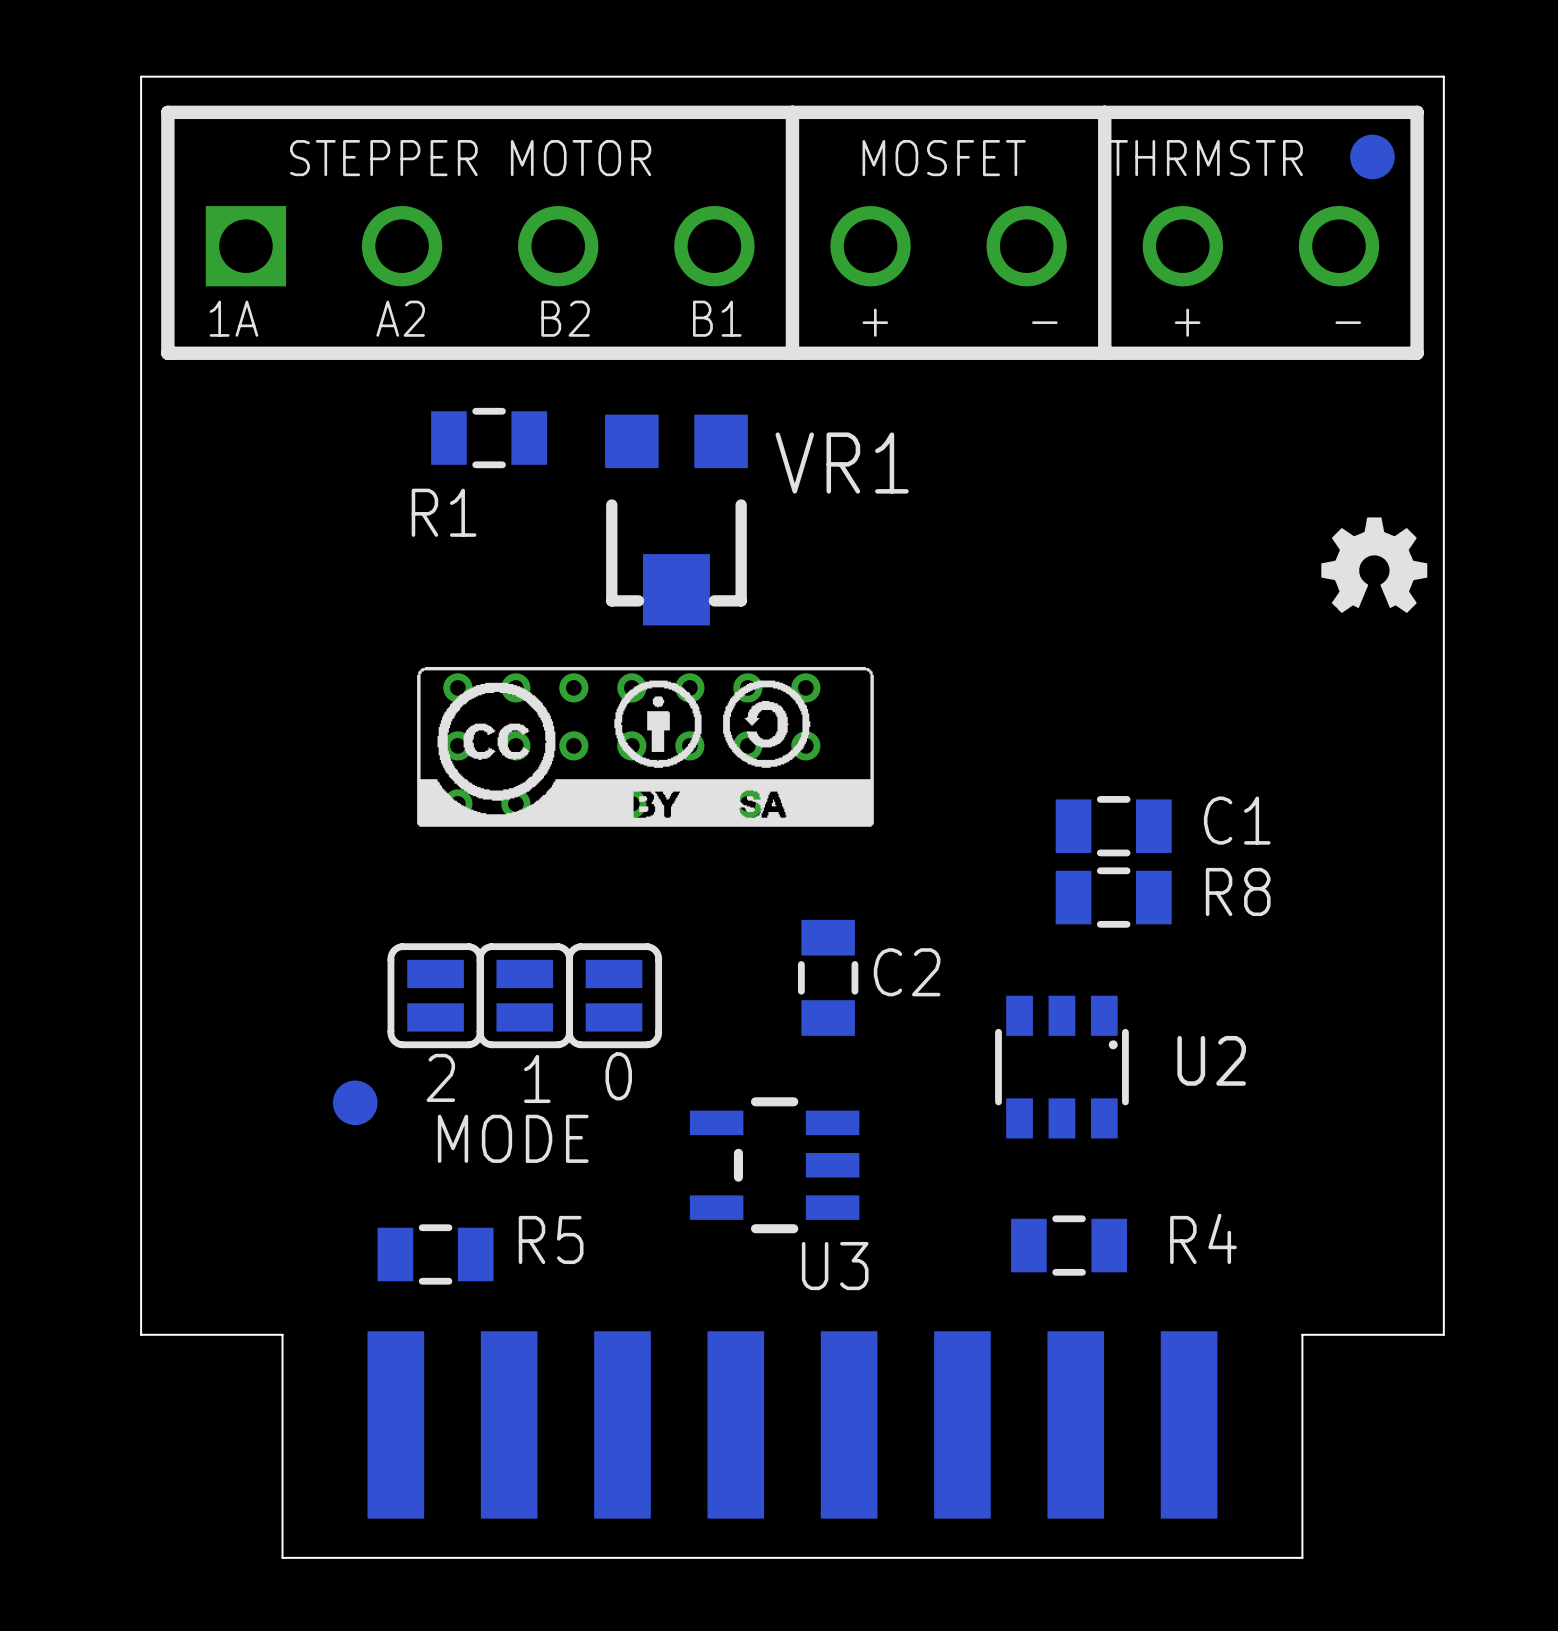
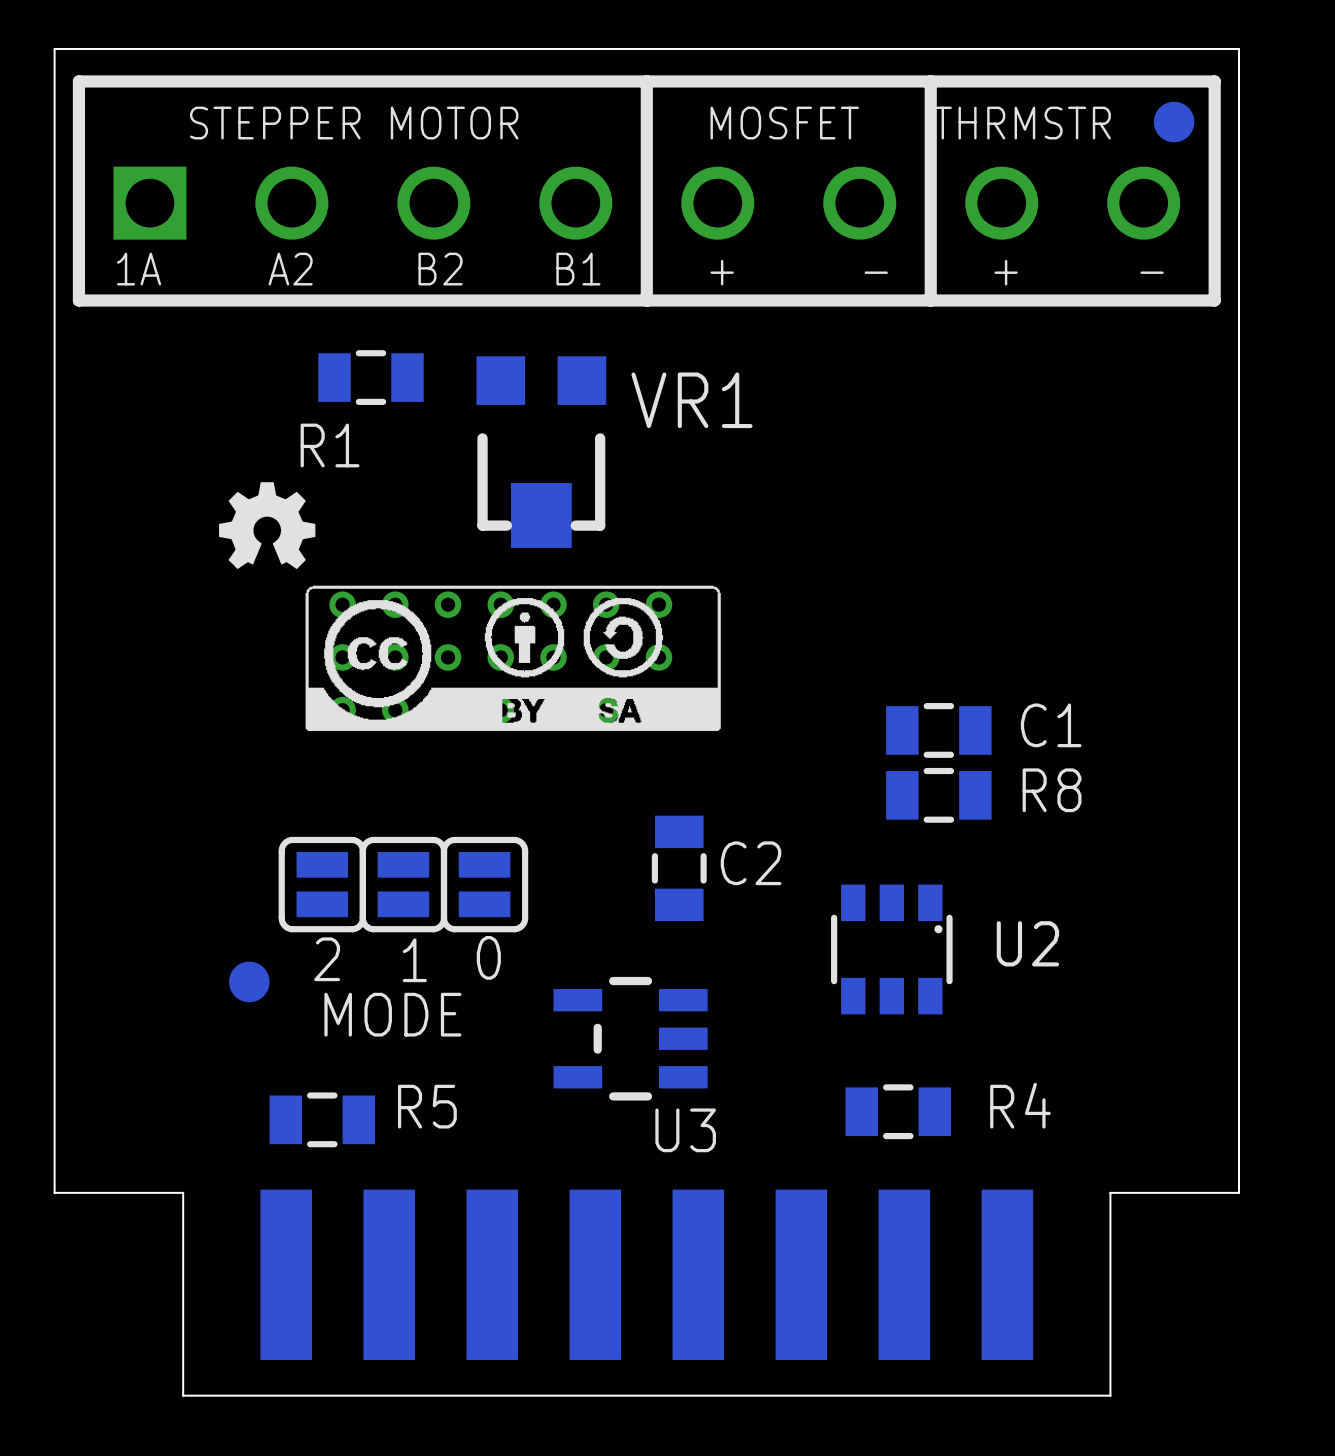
drawing position: (1374, 565) -> (267, 525)

